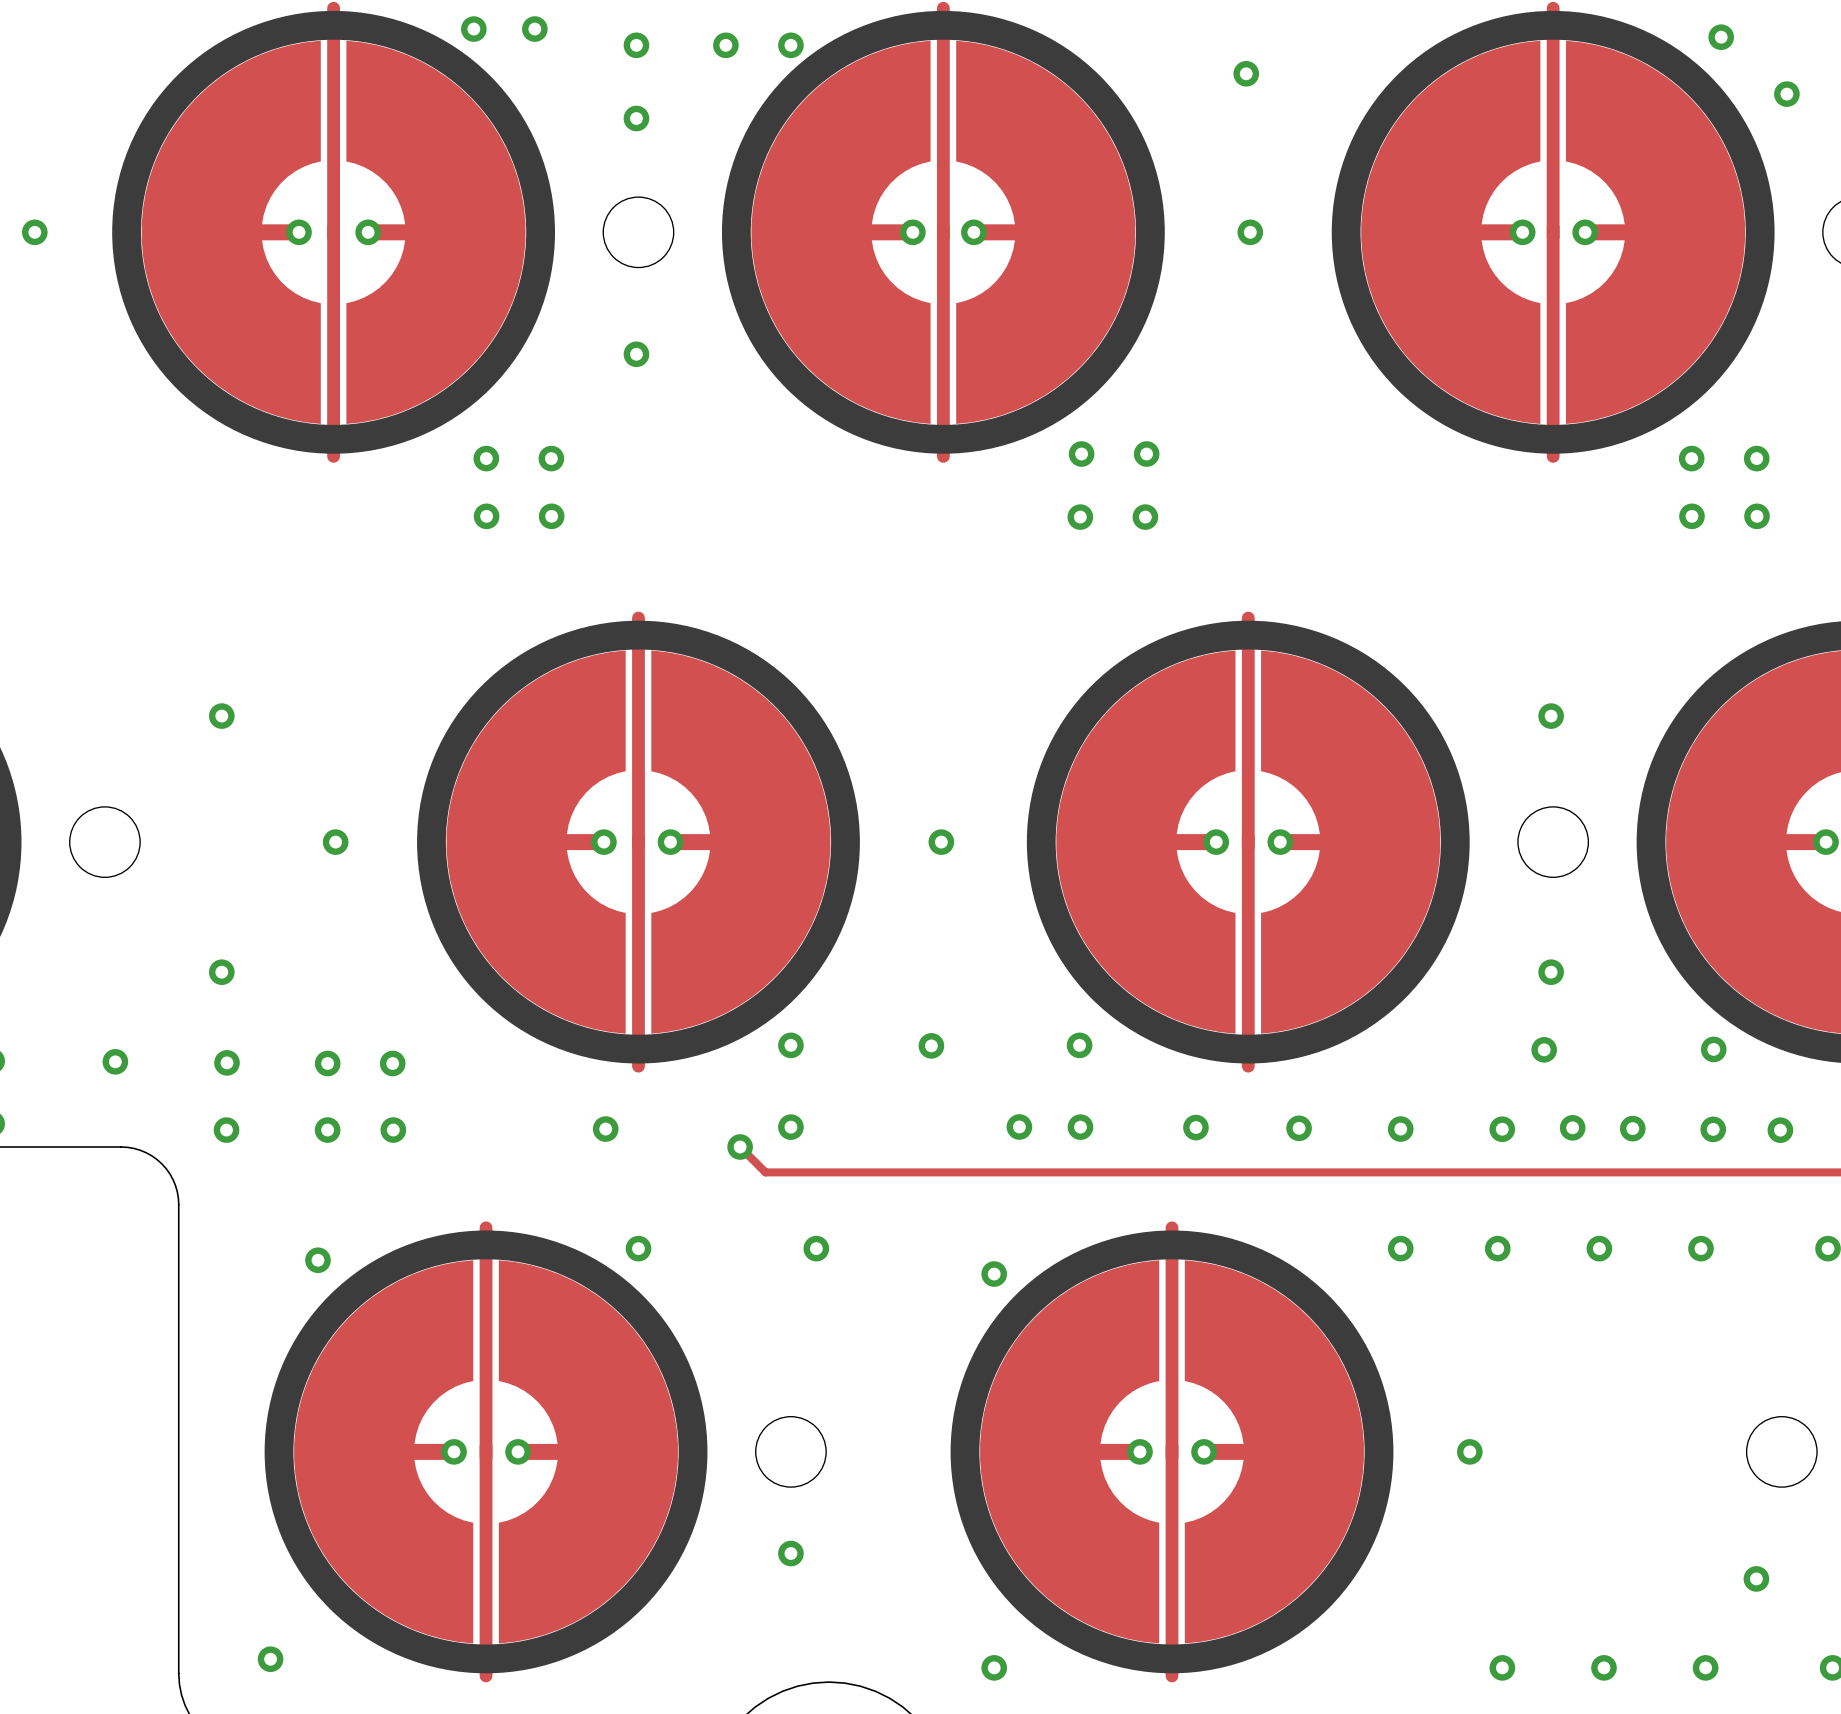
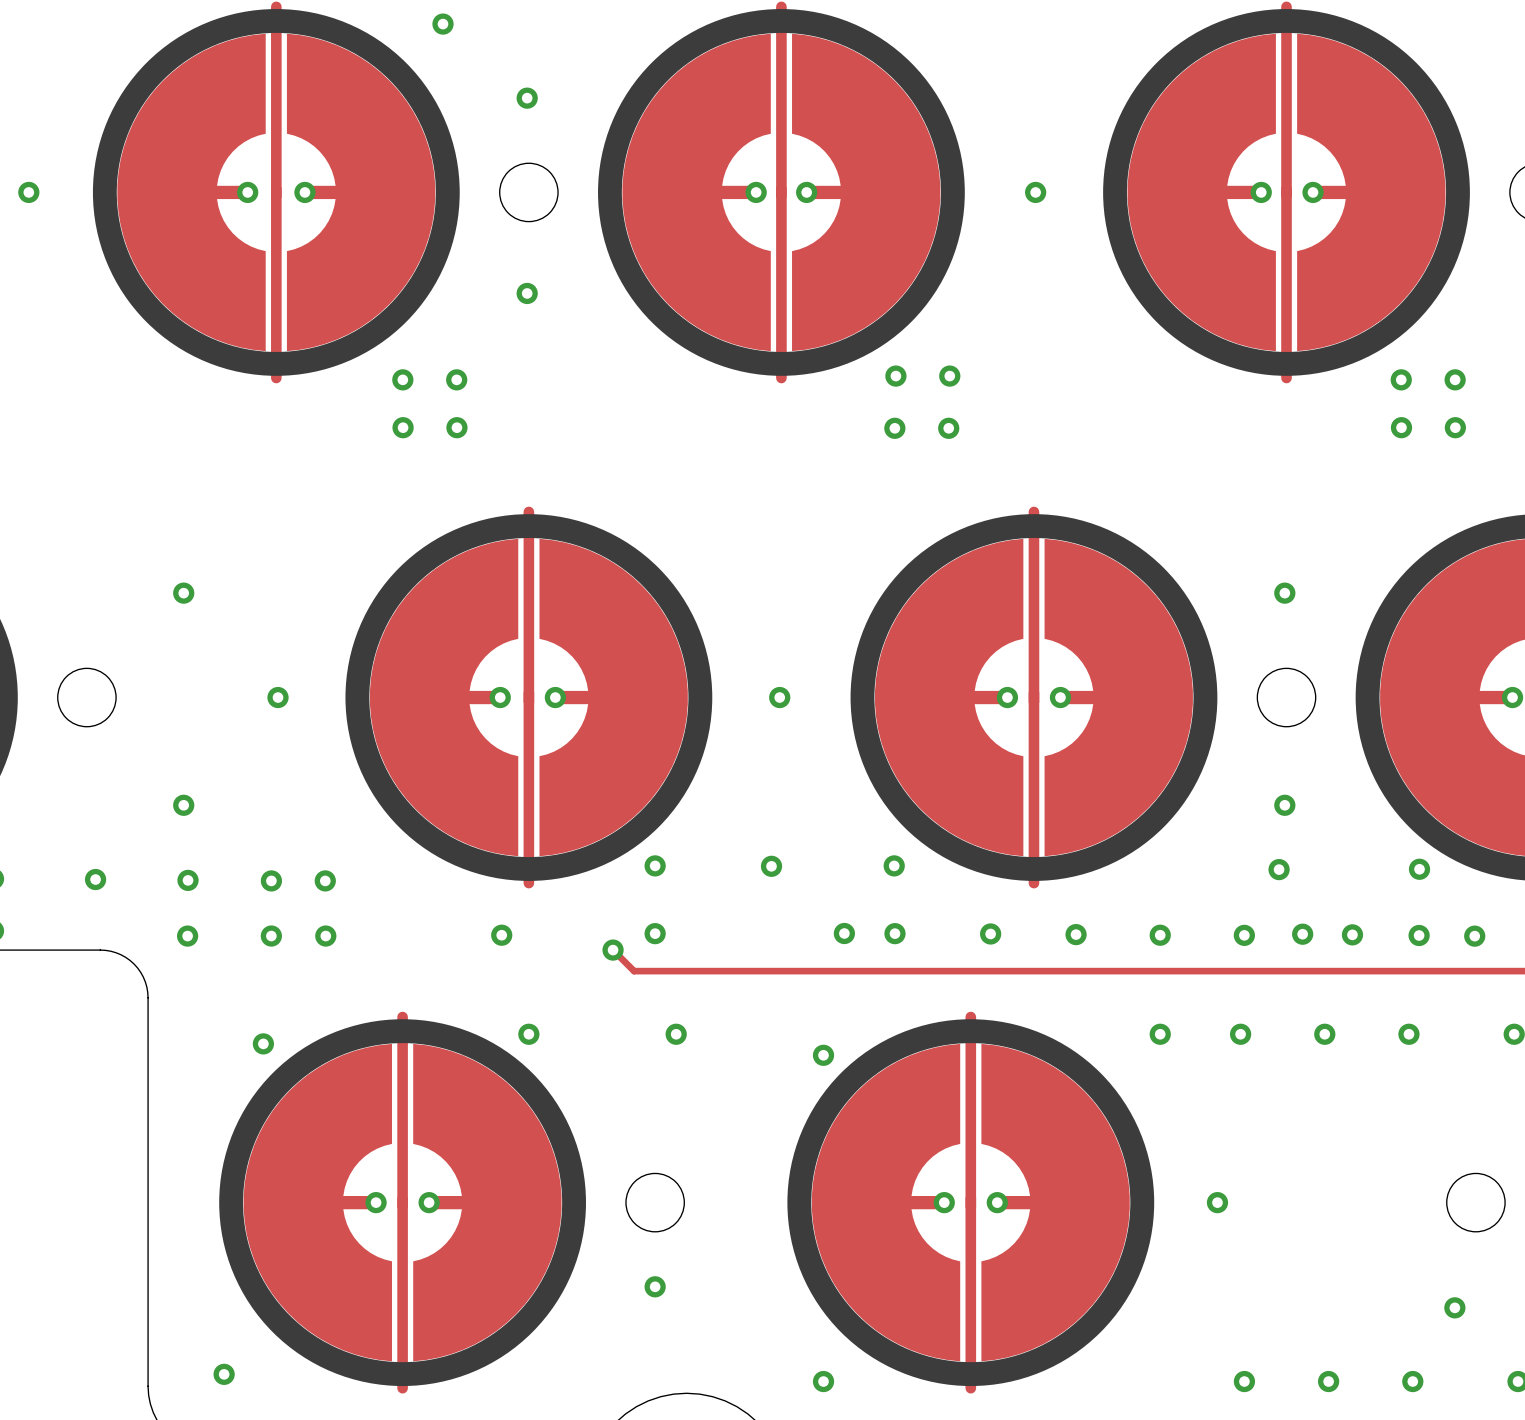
via: (473, 29) -> none
via: (1721, 37) -> none
via: (636, 45) -> none
via: (725, 45) -> none
via: (790, 45) -> none
via: (1246, 73) -> none
via: (1786, 94) -> none

